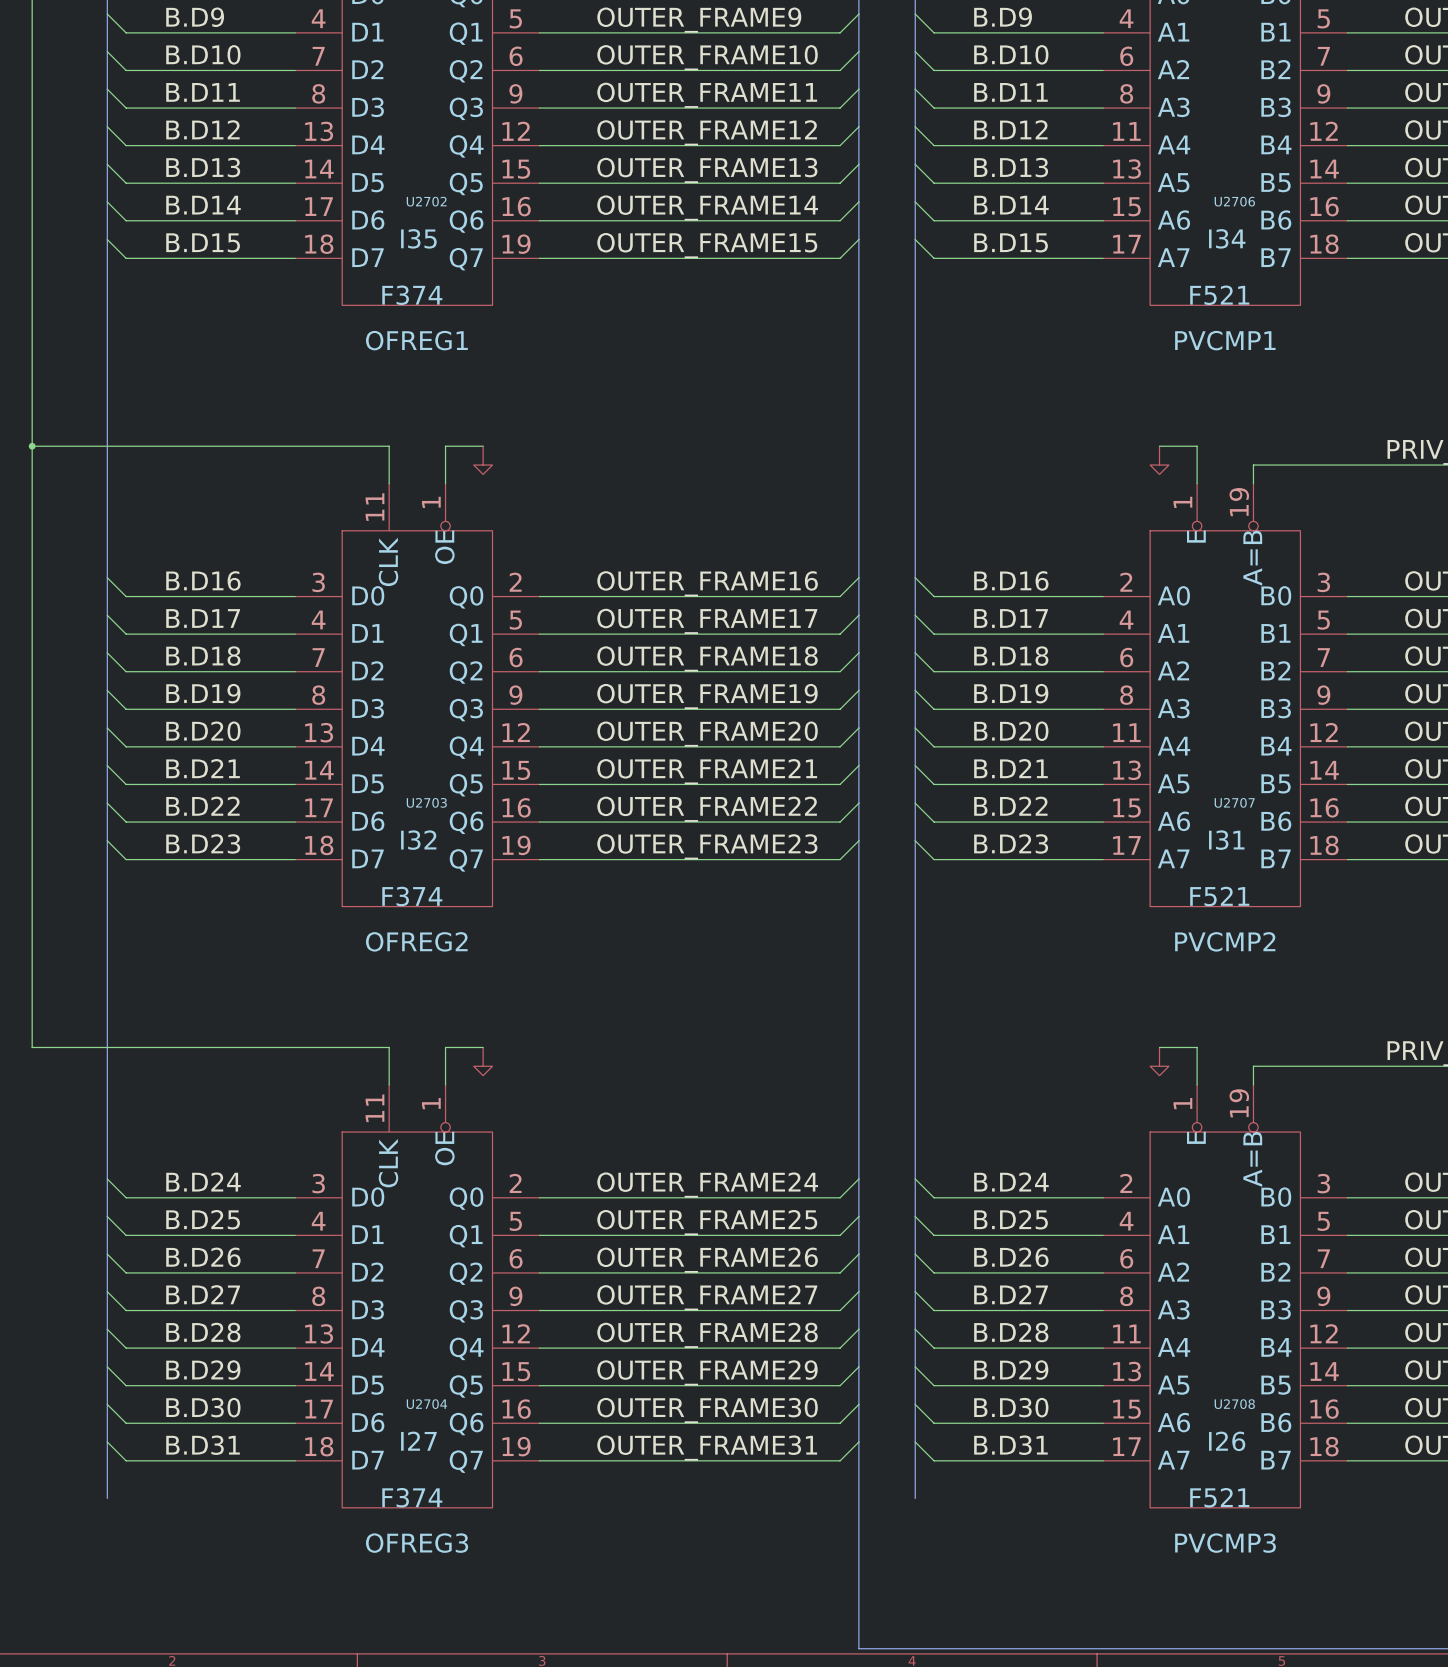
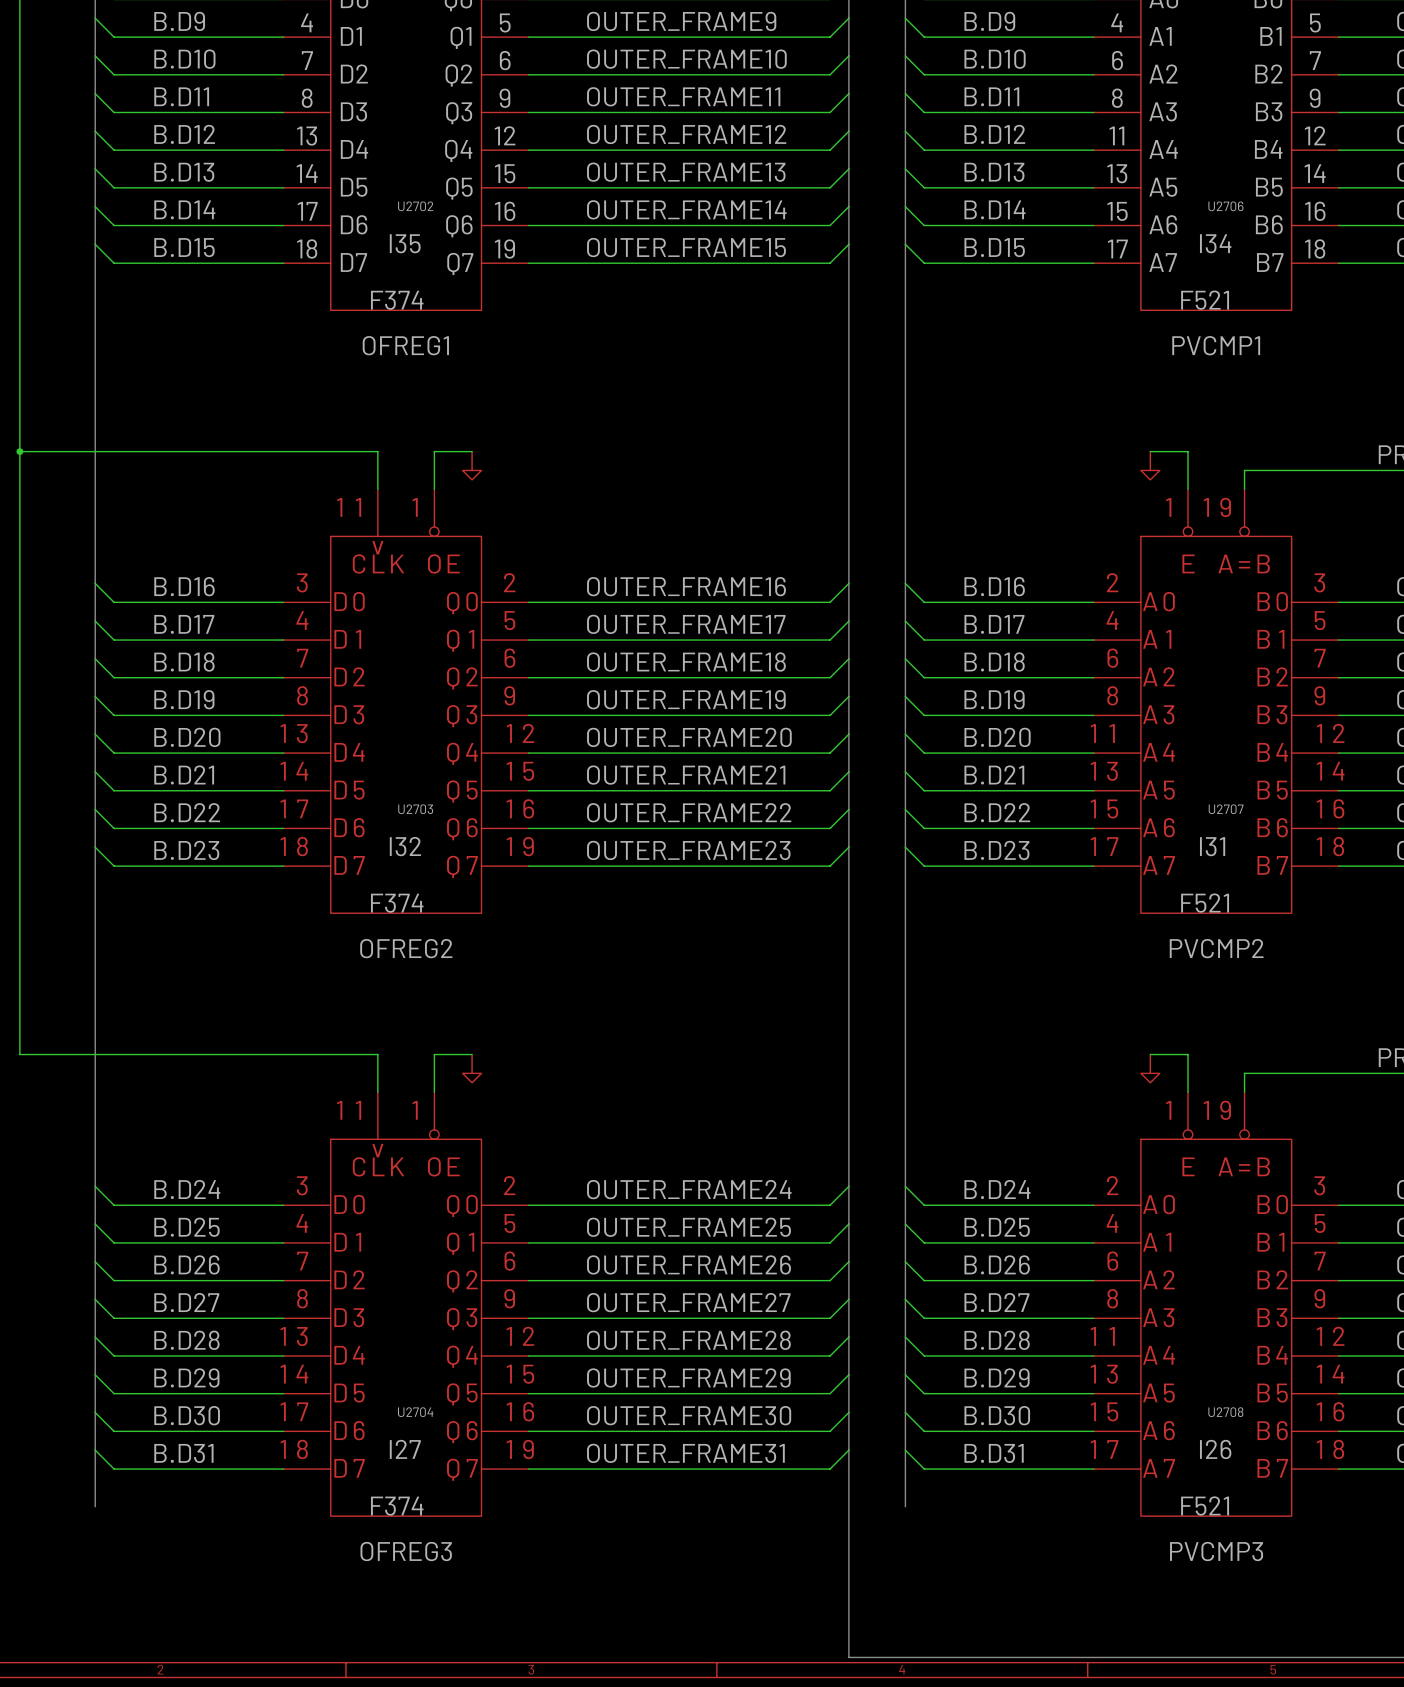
U2703 symbol: [295, 483, 540, 907] -> [283, 489, 529, 914]
U2707 symbol: [1103, 483, 1348, 907] -> [1093, 489, 1339, 914]
U2704 symbol: [295, 1085, 540, 1508] -> [283, 1092, 529, 1517]
U2708 symbol: [1103, 1085, 1348, 1508] -> [1093, 1092, 1339, 1517]

